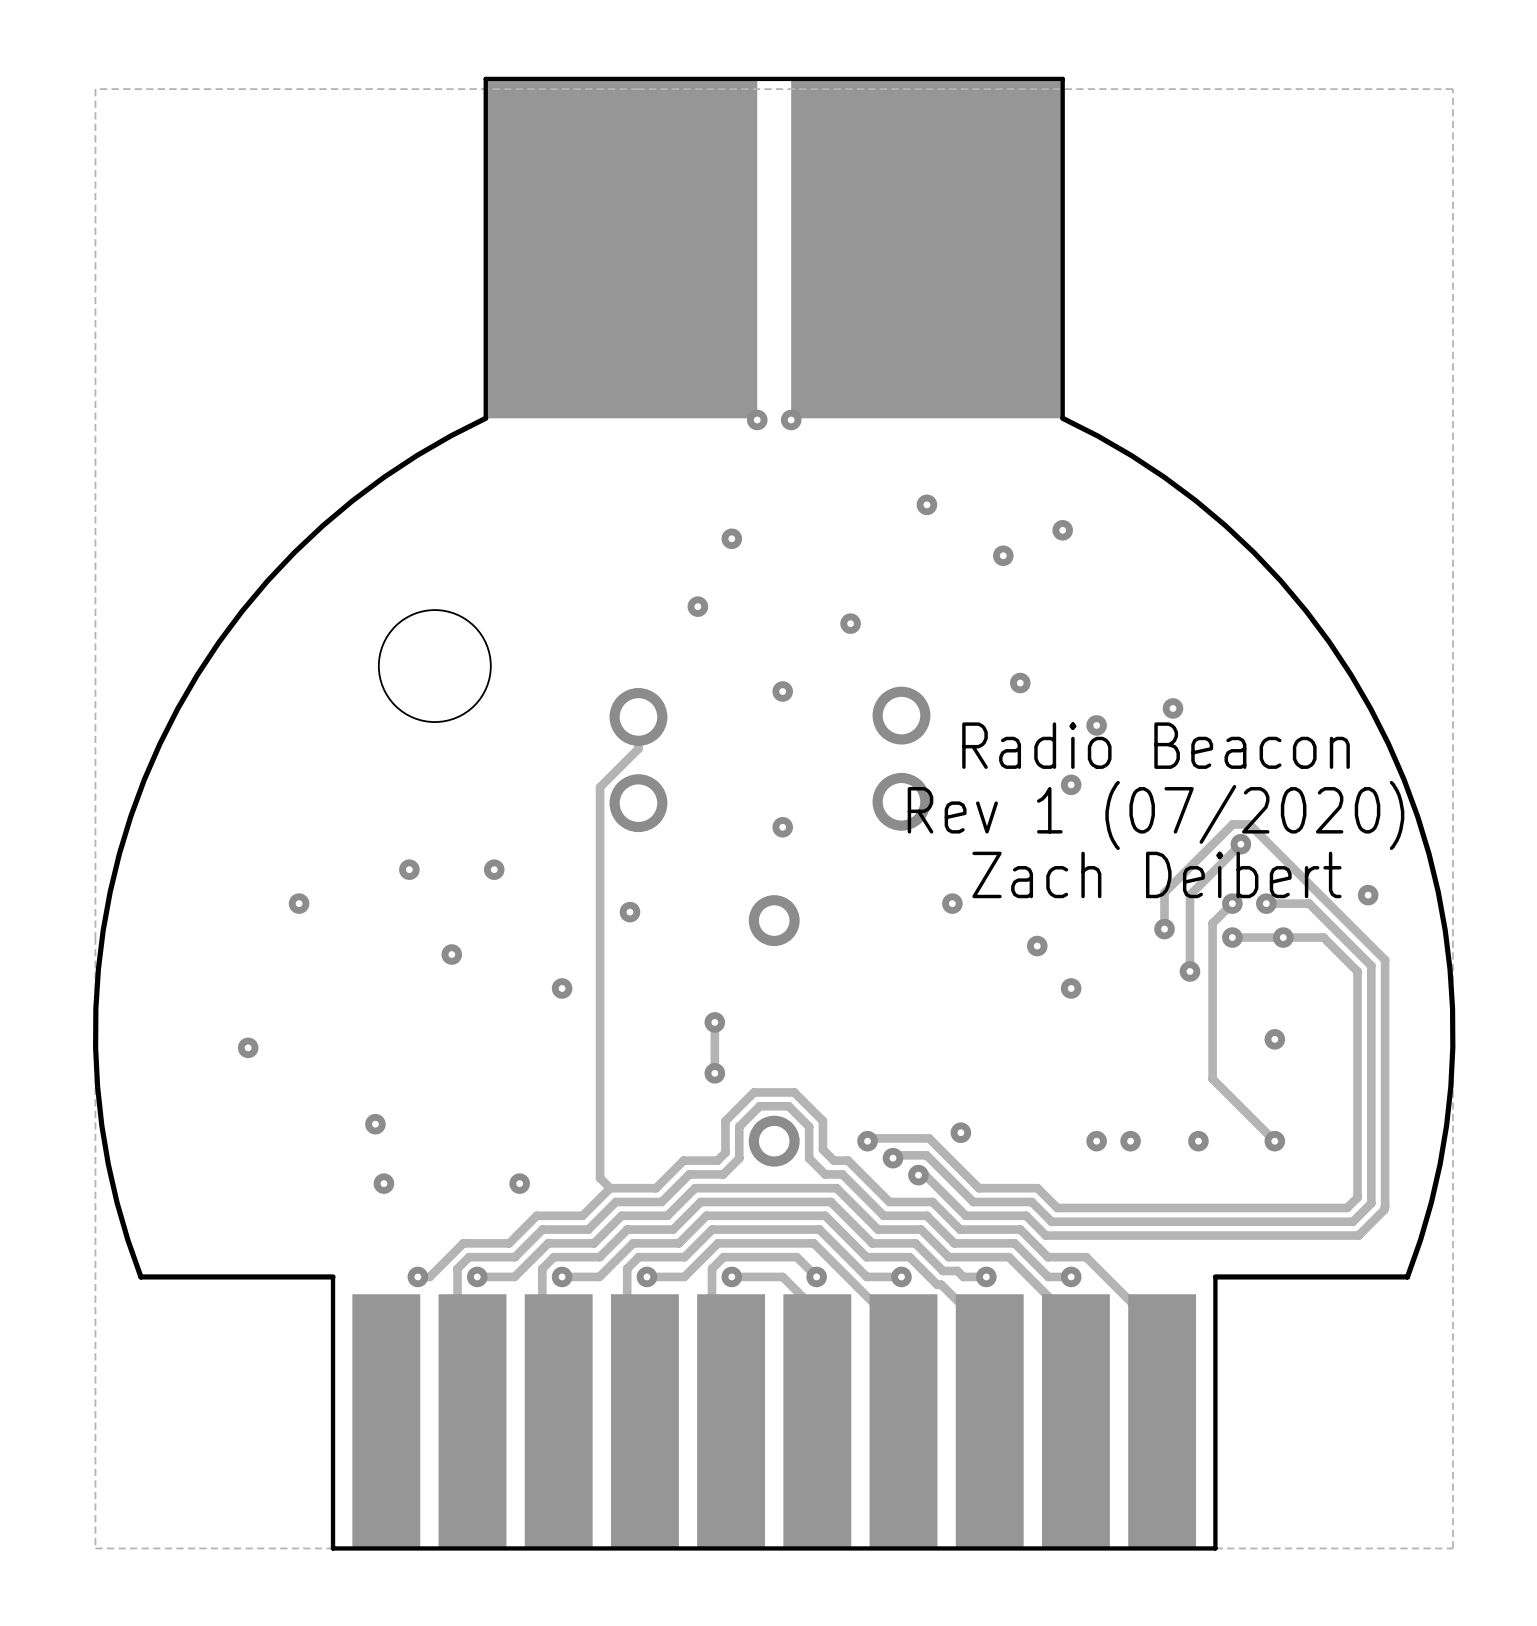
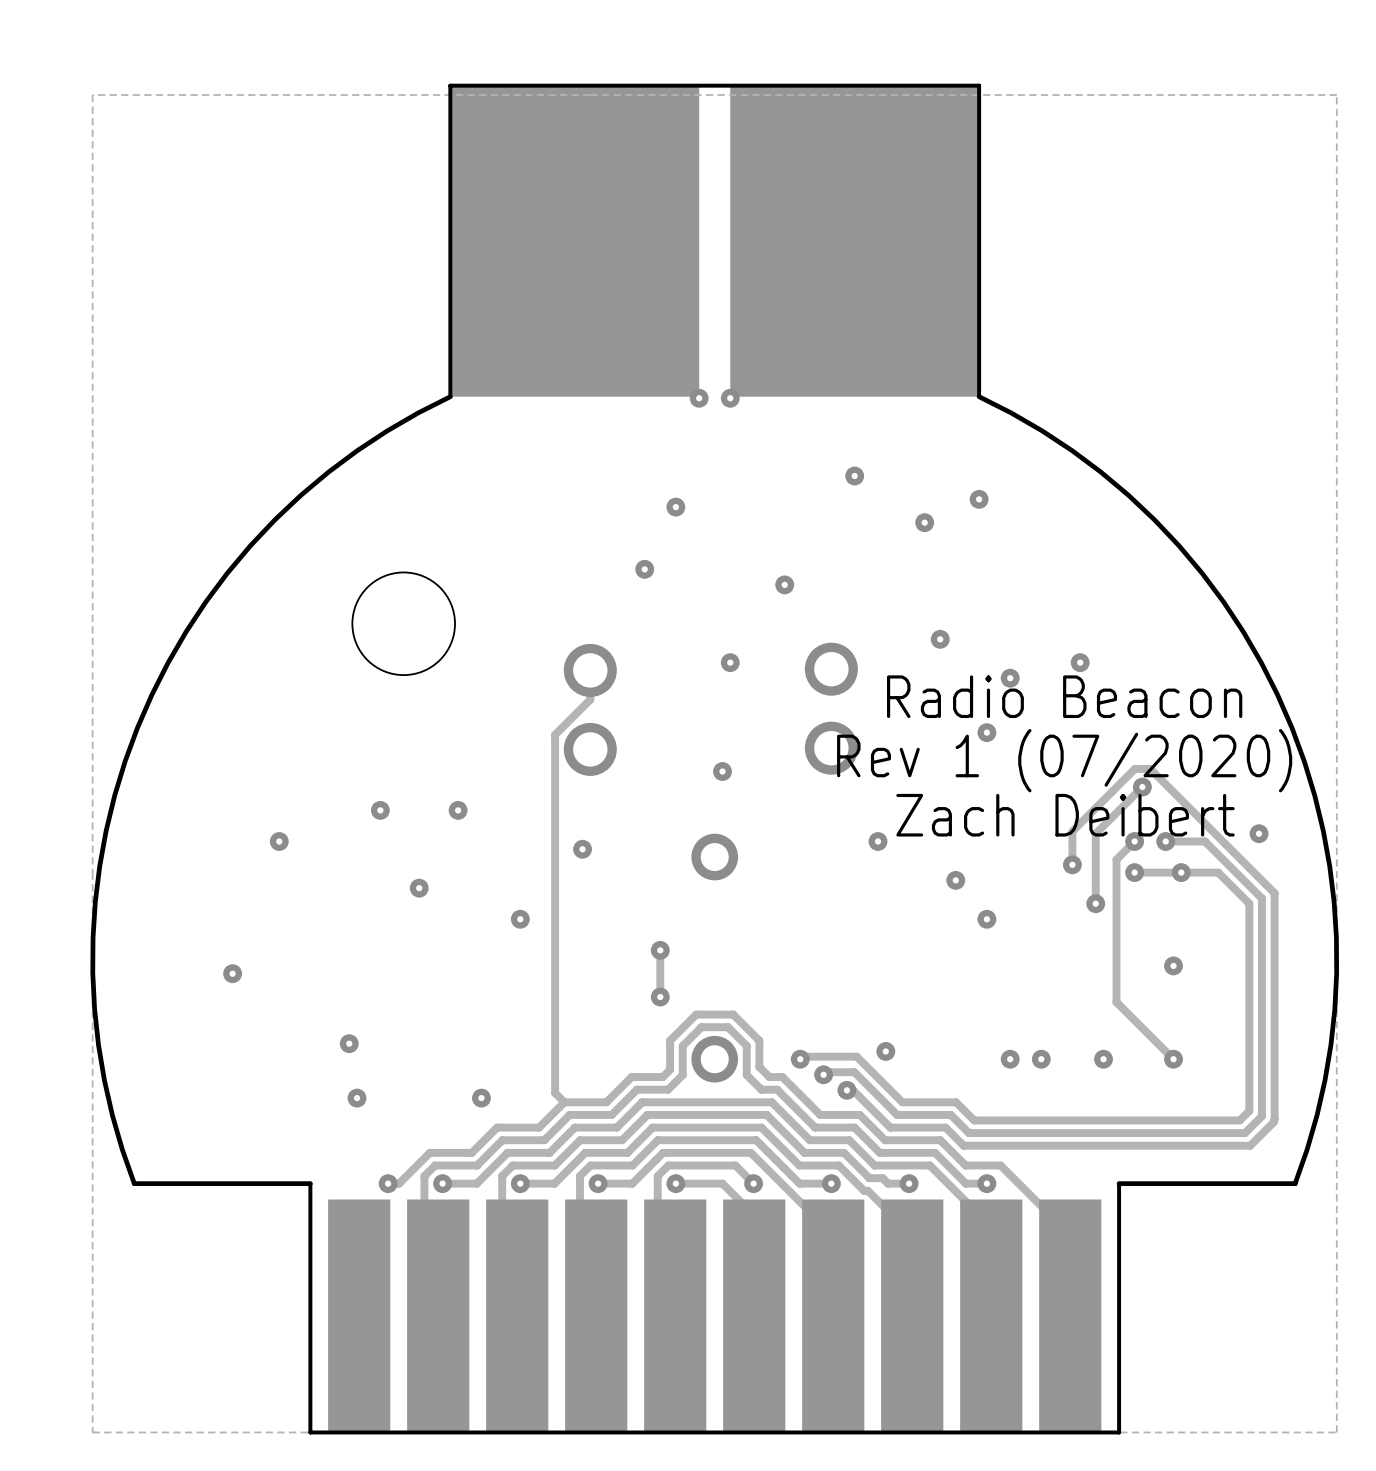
via position: (782, 691) -> (730, 662)

